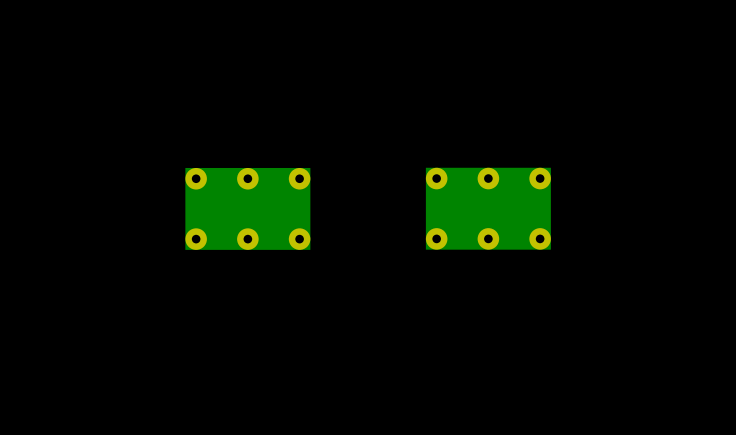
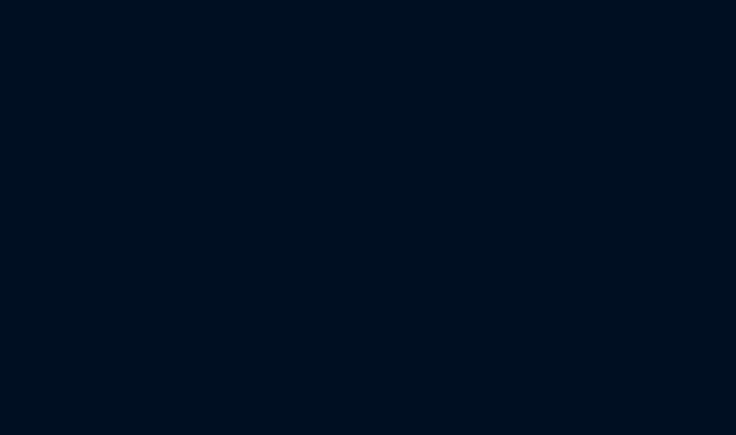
part: (247, 208) -> none
part: (488, 208) -> none

